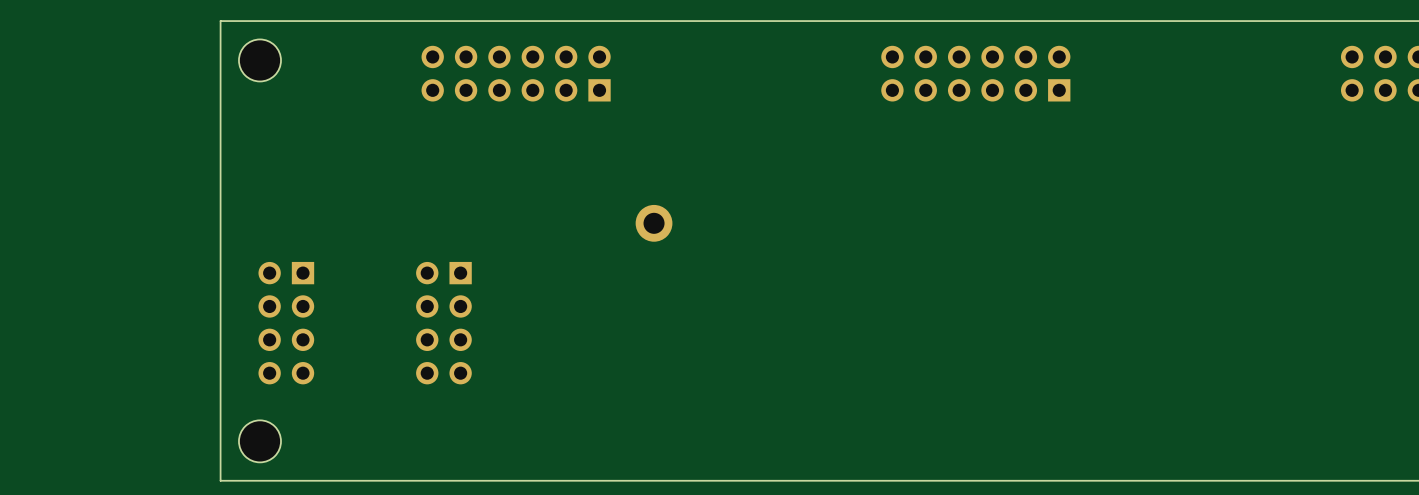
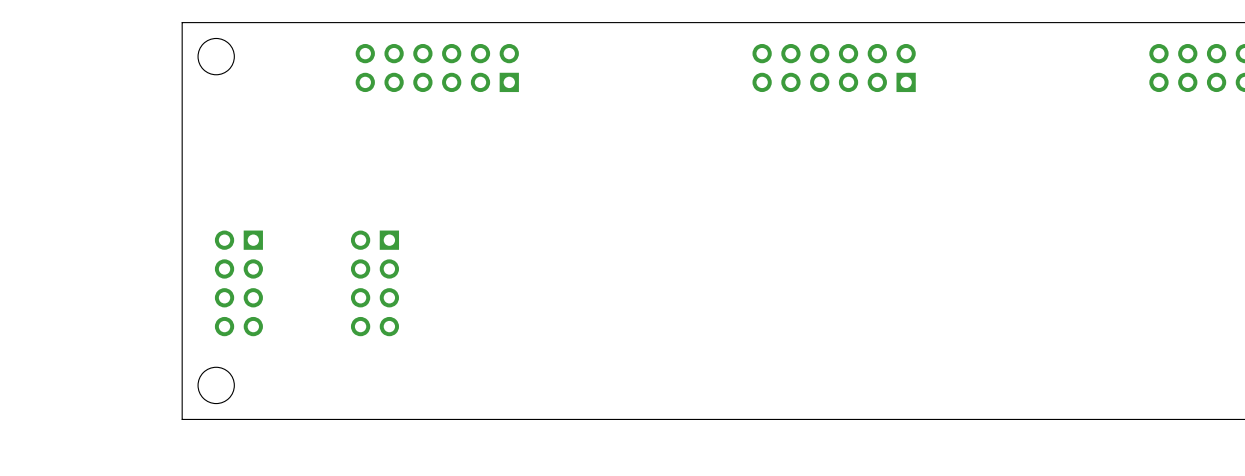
part: (654, 223) -> none

